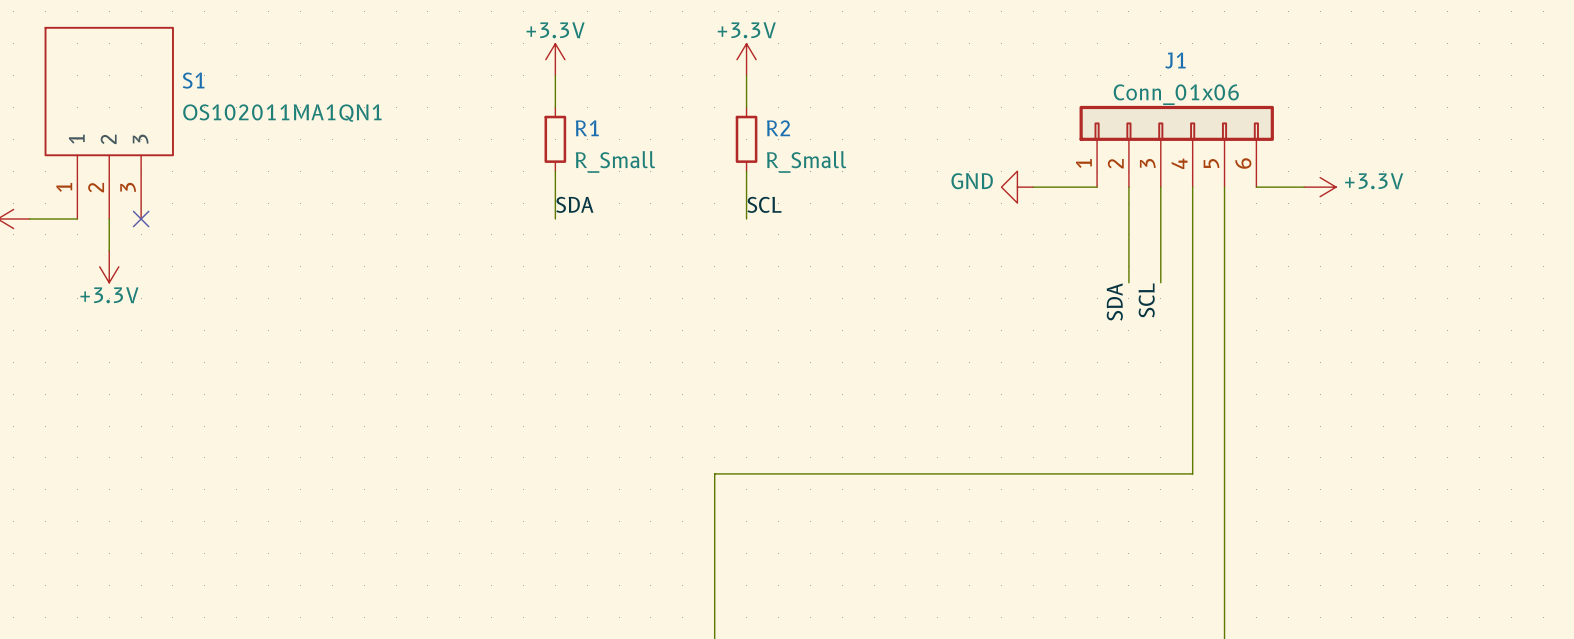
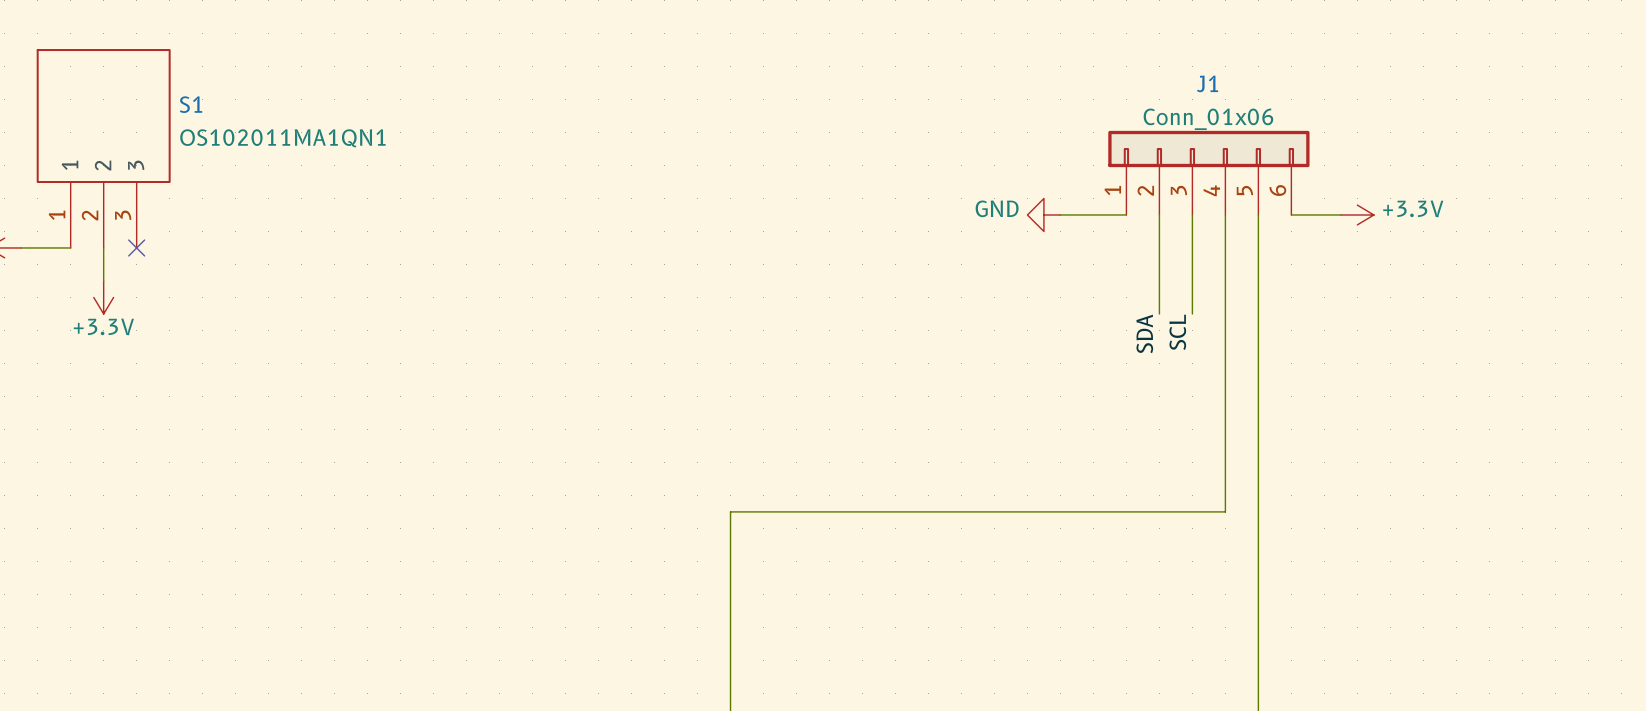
power symbol: +3.3V (555, 59) -> none
power symbol: +3.3V (746, 59) -> none
wire: (555, 75) (555, 107) -> none
wire: (746, 75) (746, 107) -> none
R1: R_Small (555, 139) -> none
R2: R_Small (746, 139) -> none
wire: (555, 171) (555, 219) -> none
wire: (746, 171) (746, 219) -> none
label: SDA (574, 204) -> none
label: SCL (764, 204) -> none

